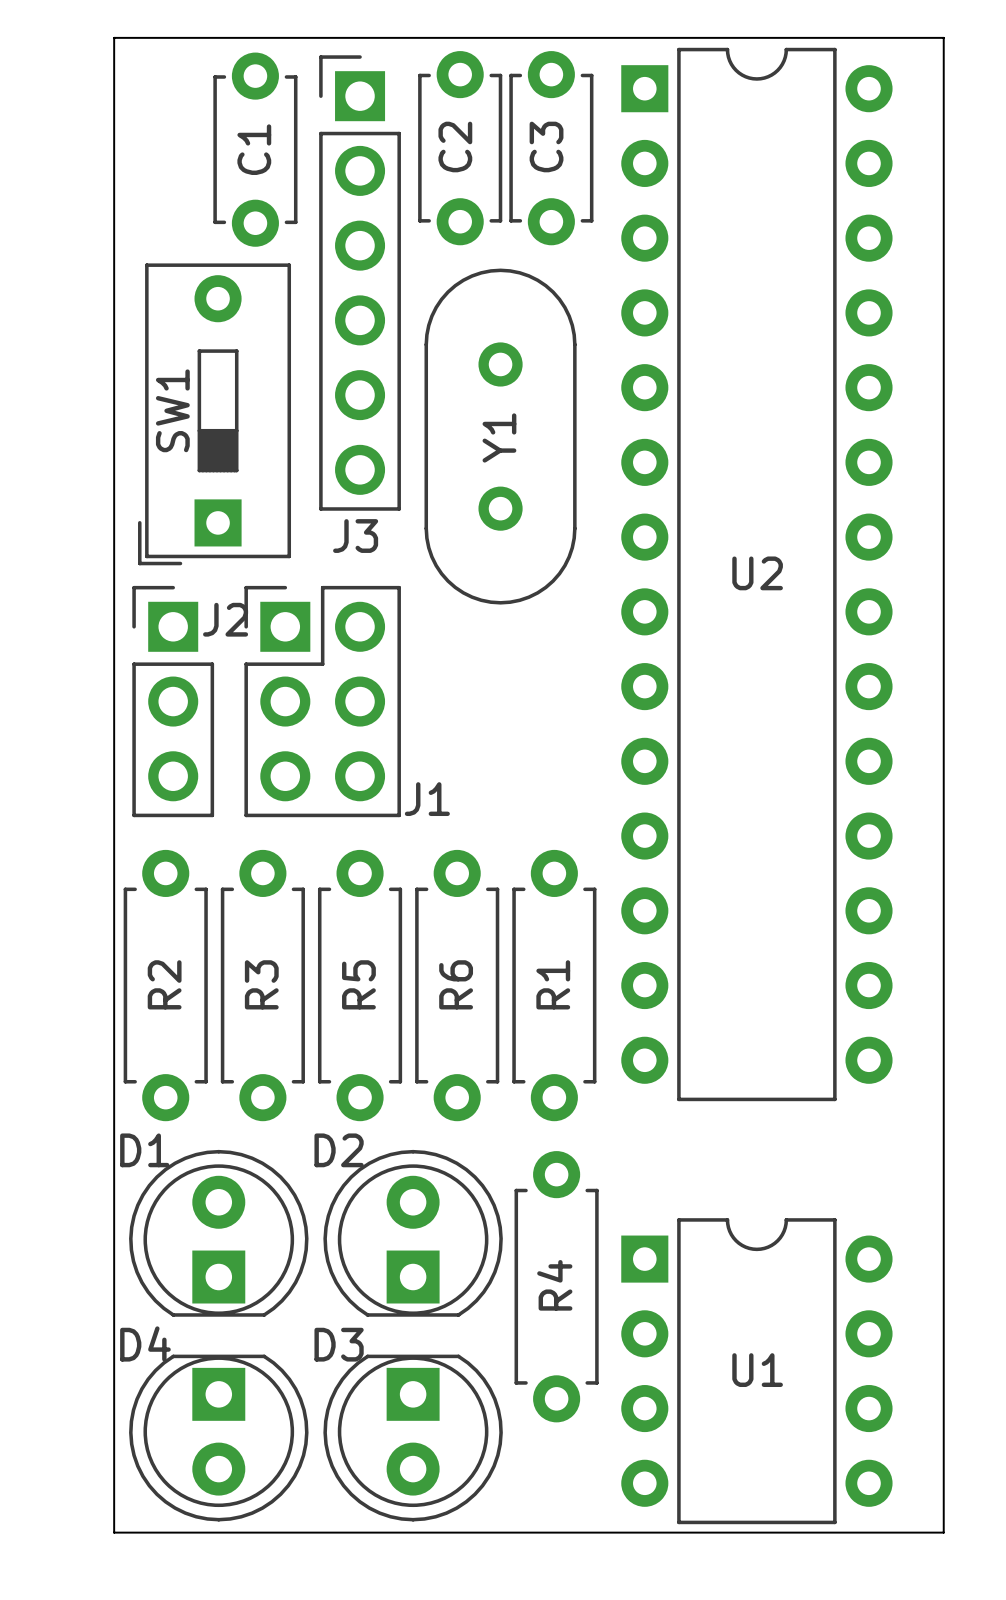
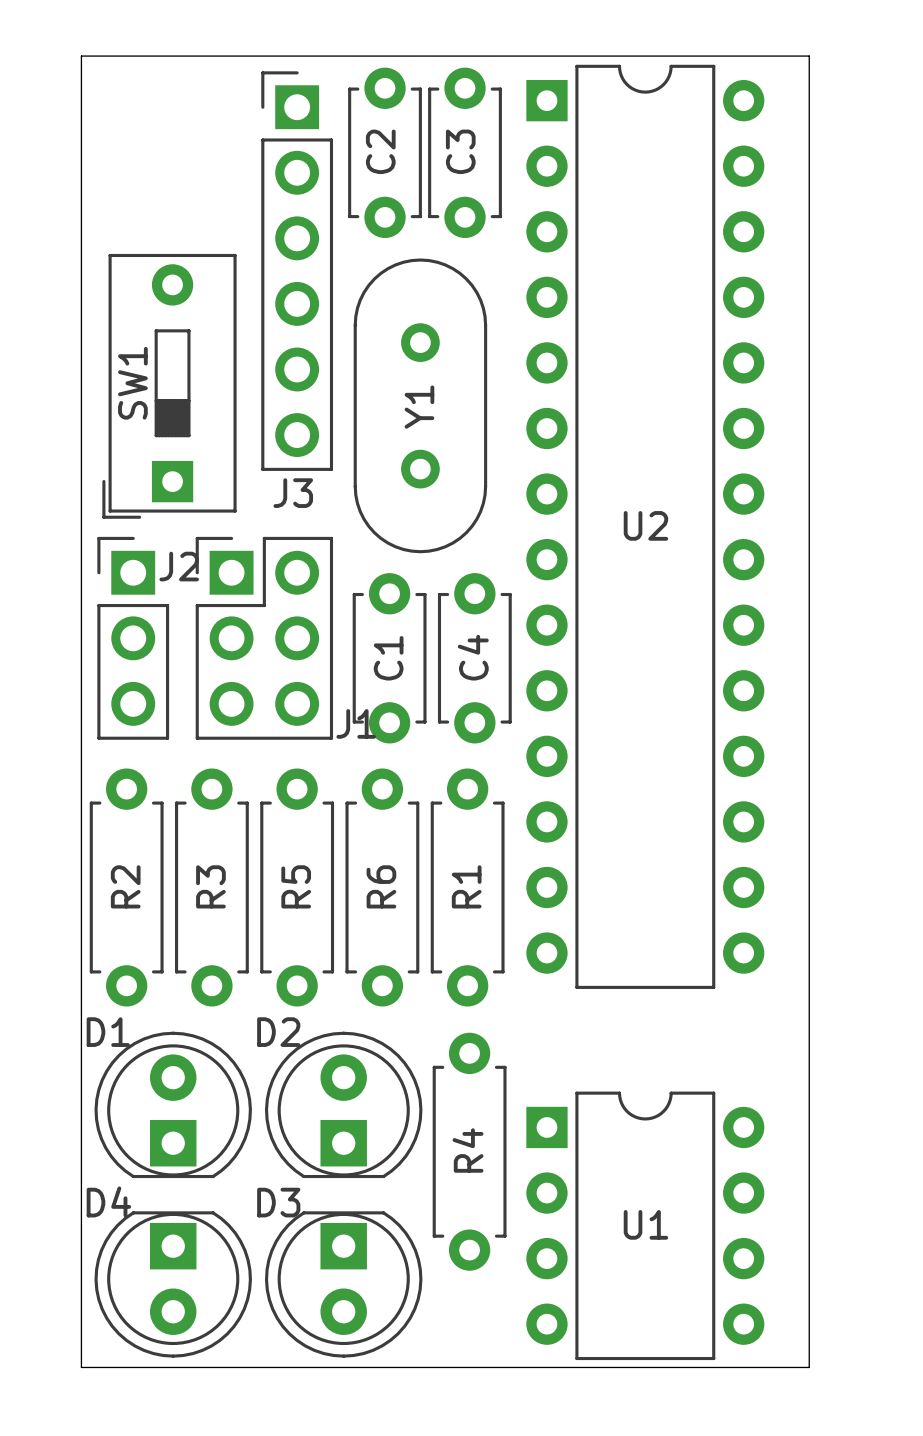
C1 position: (255, 149) -> (389, 658)
C4: none -> (474, 658)

